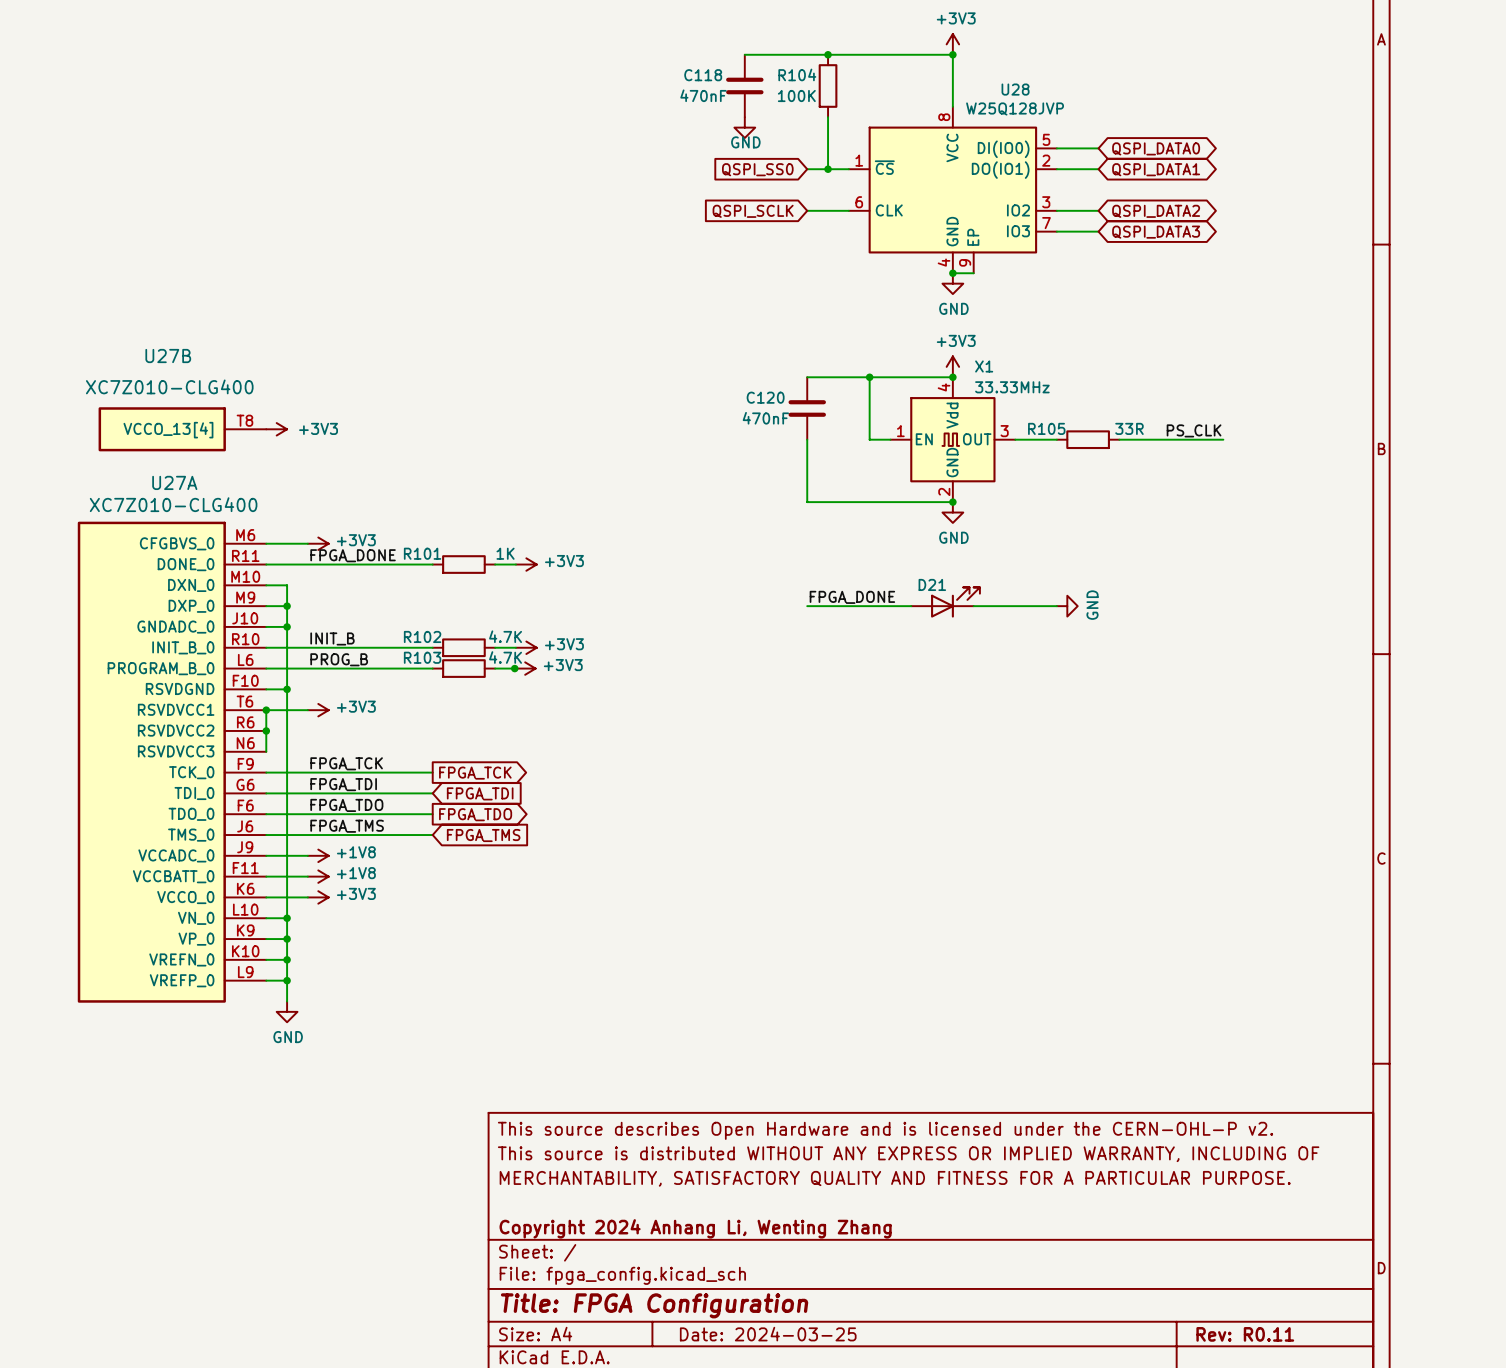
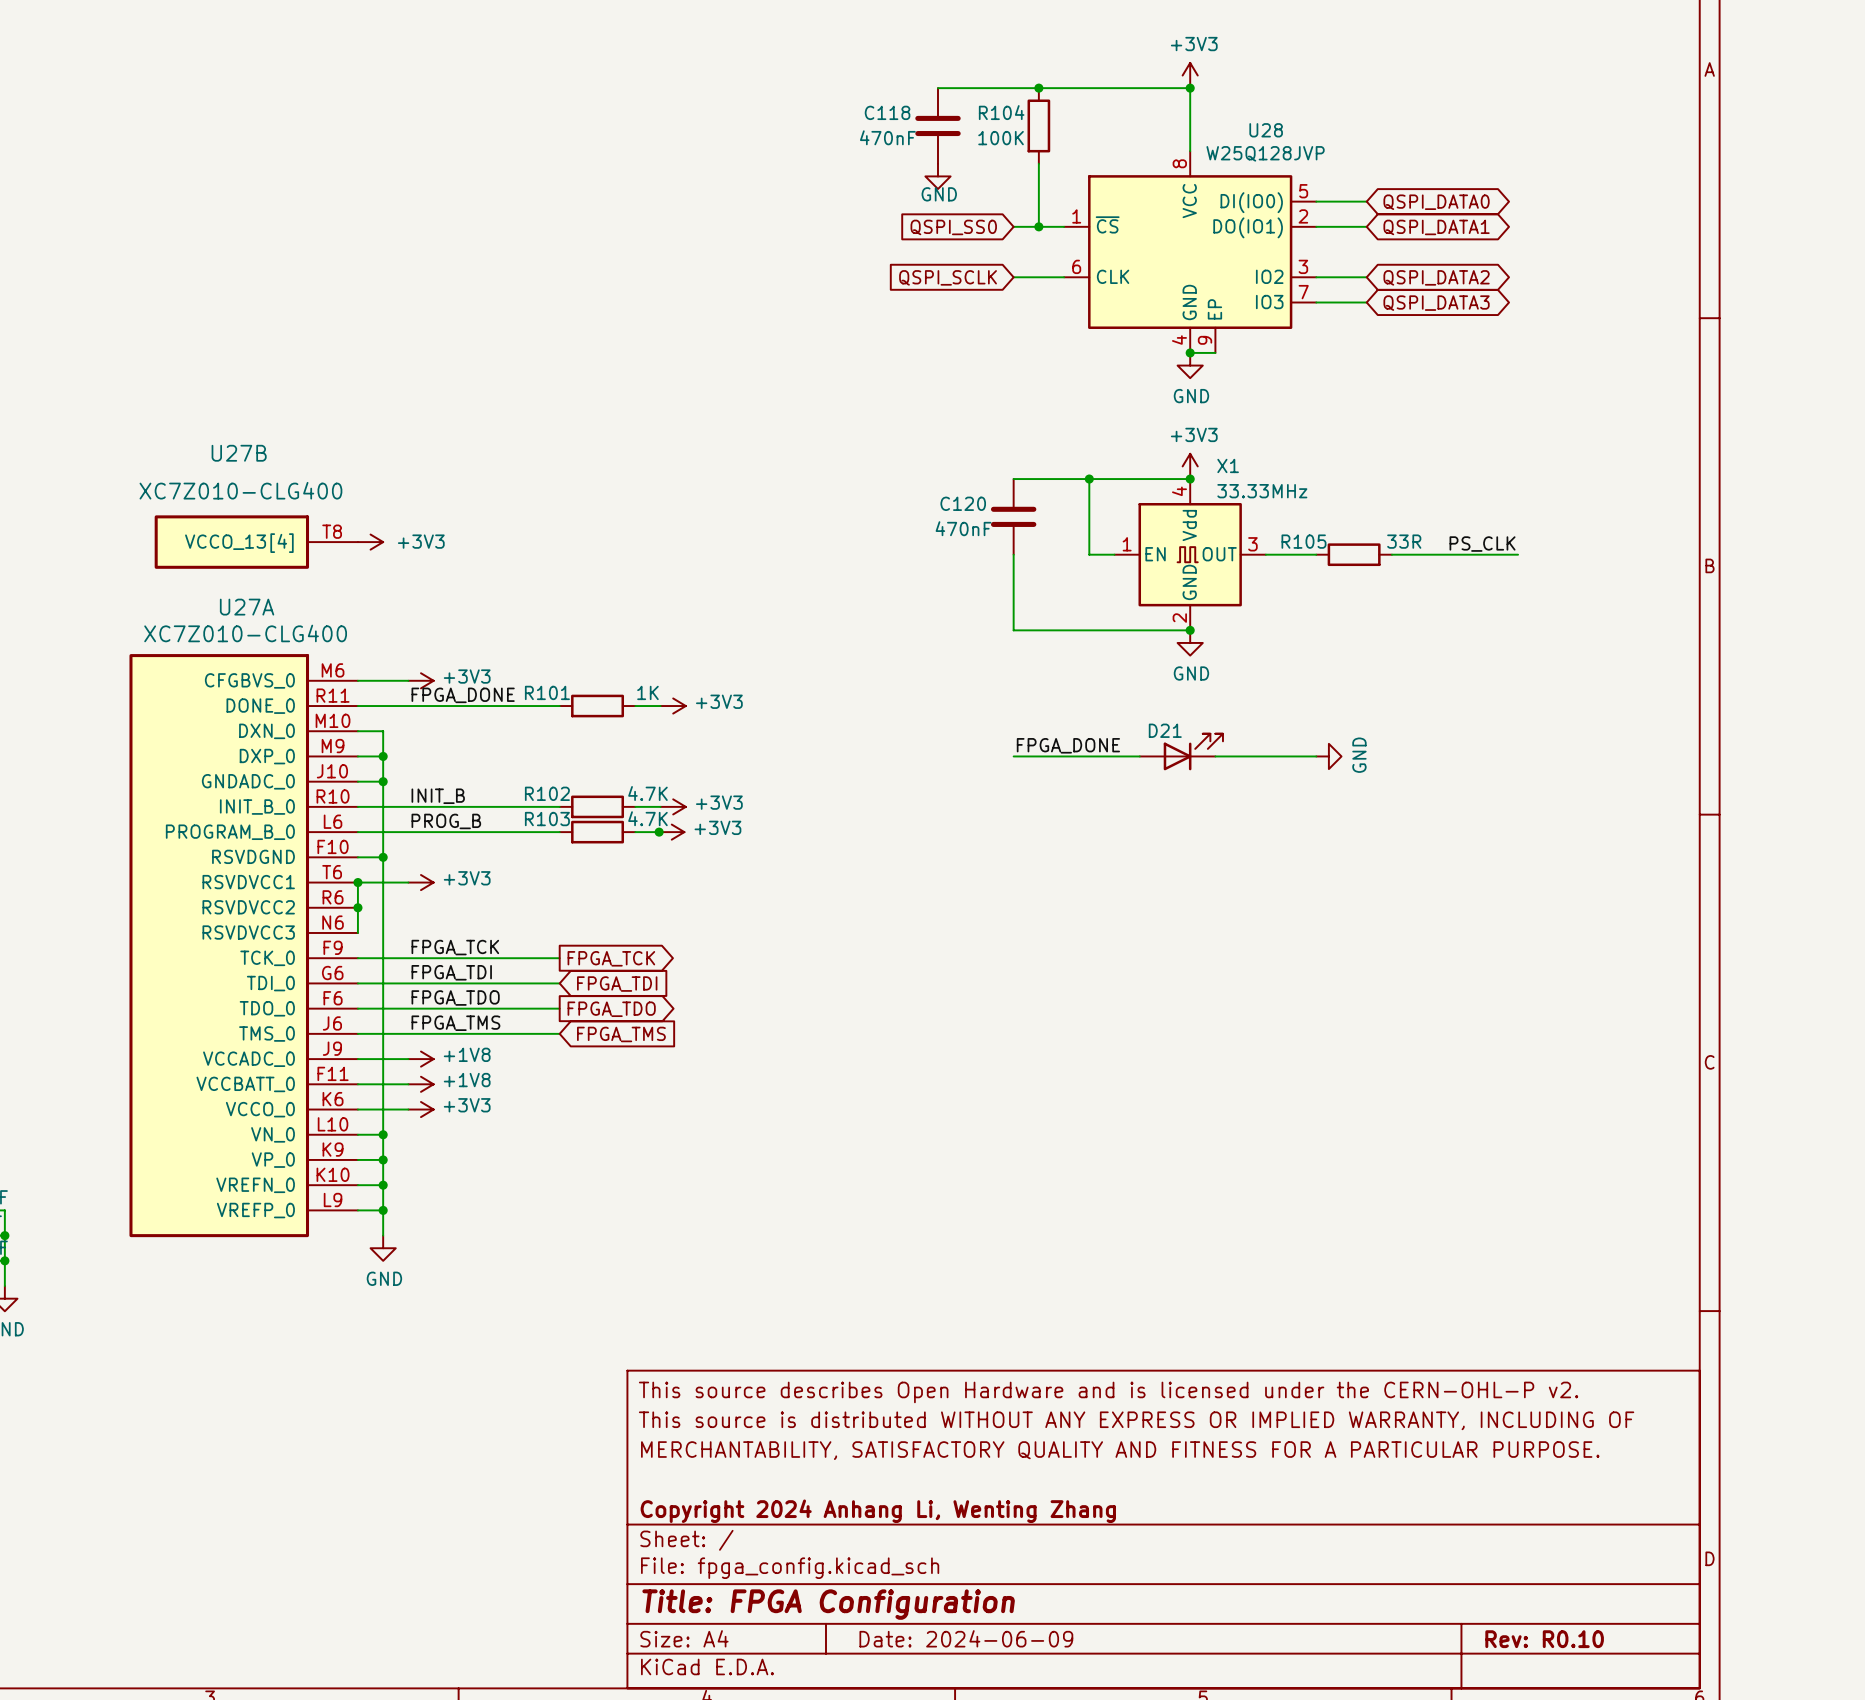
title block: Date: 2024-03-25 (768, 1334) -> Date: 2024-06-09 (966, 1638)
title block: Rev: R0.11 (1245, 1334) -> Rev: R0.10 (1544, 1639)

